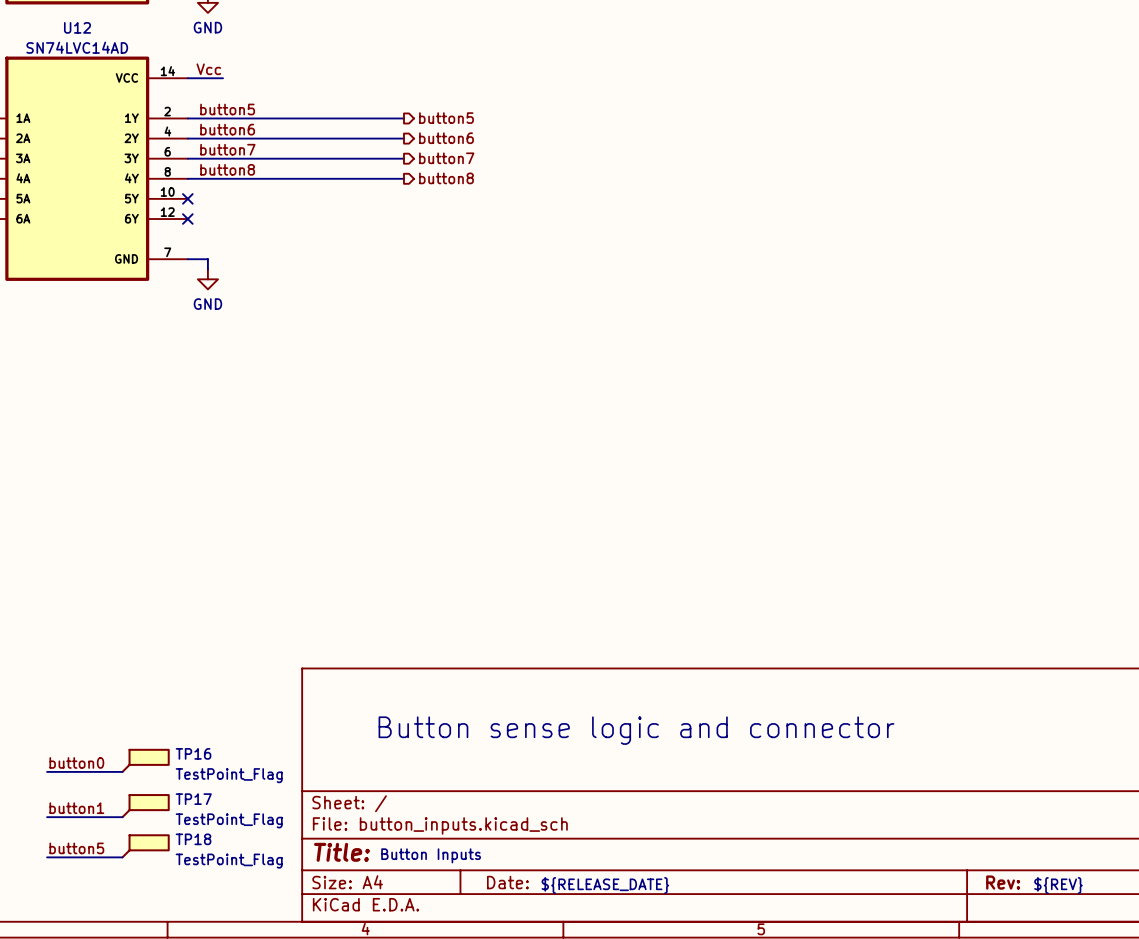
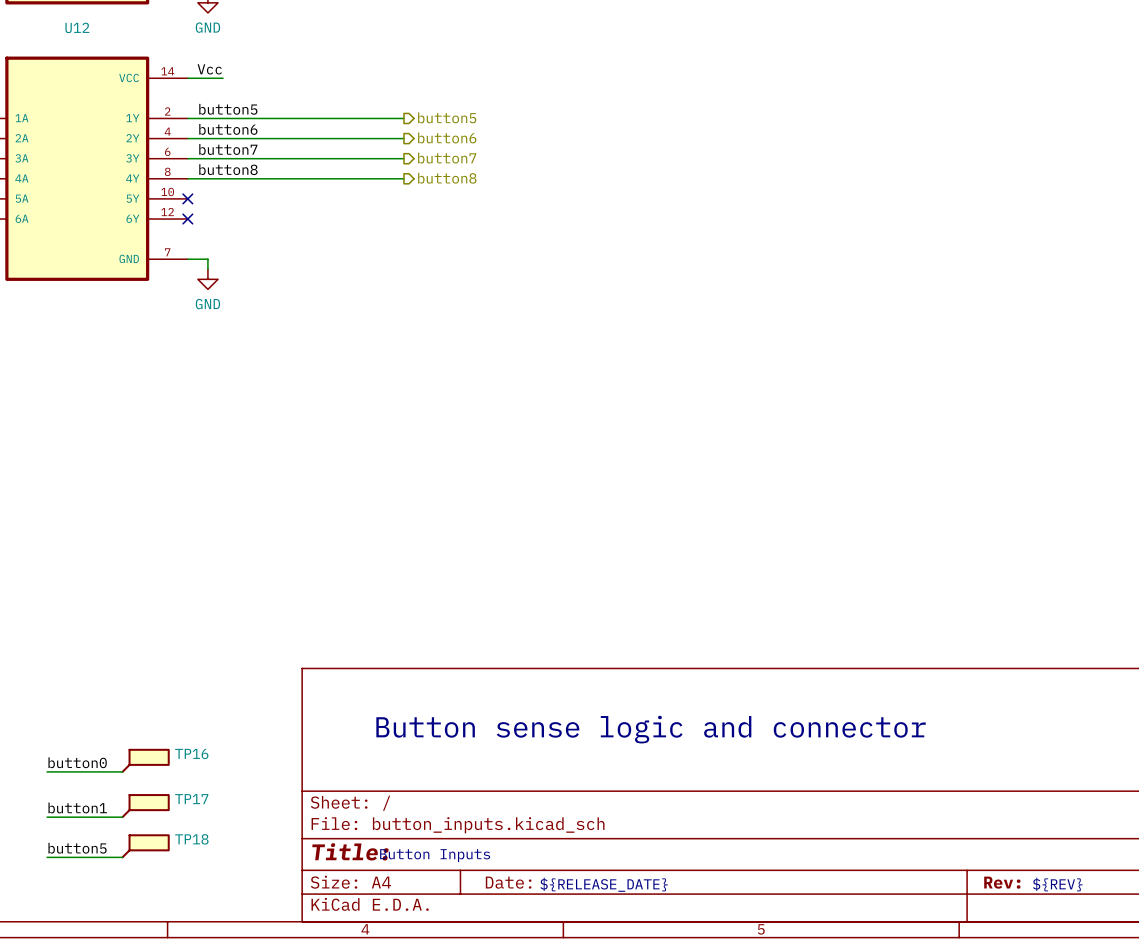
U12 value: SN74LVC14AD (77, 47) -> none
TP16 value: TestPoint_Flag (229, 775) -> none
TP17 value: TestPoint_Flag (229, 820) -> none
TP18 value: TestPoint_Flag (229, 861) -> none

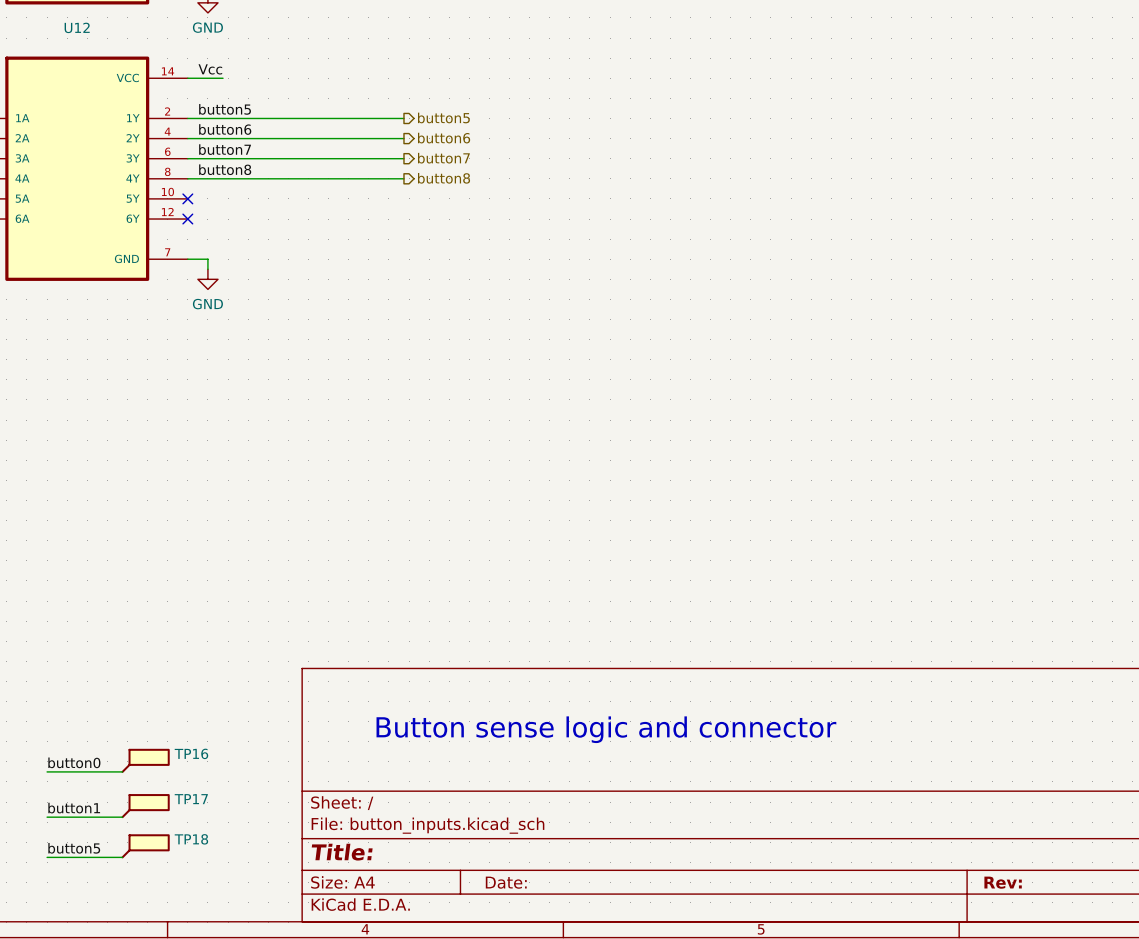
text: Button Inputs (435, 855) -> none
text: ${RELEASE_DATE} (604, 884) -> none
text: ${REV} (1057, 884) -> none

